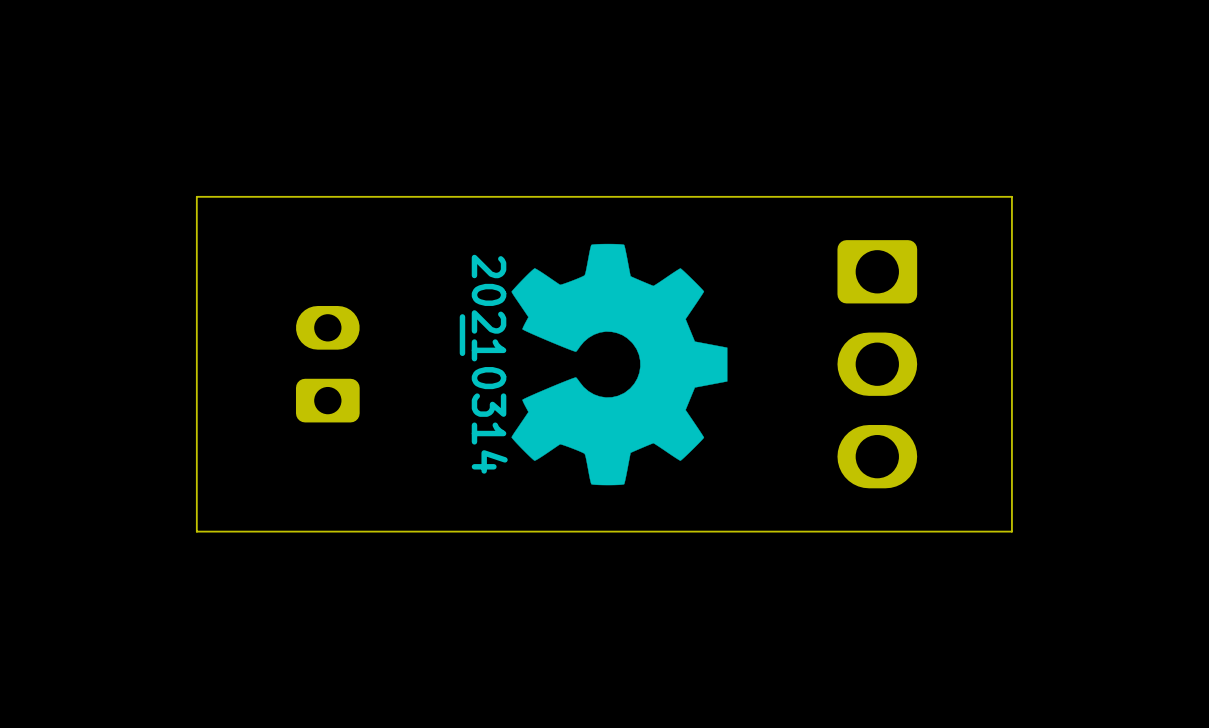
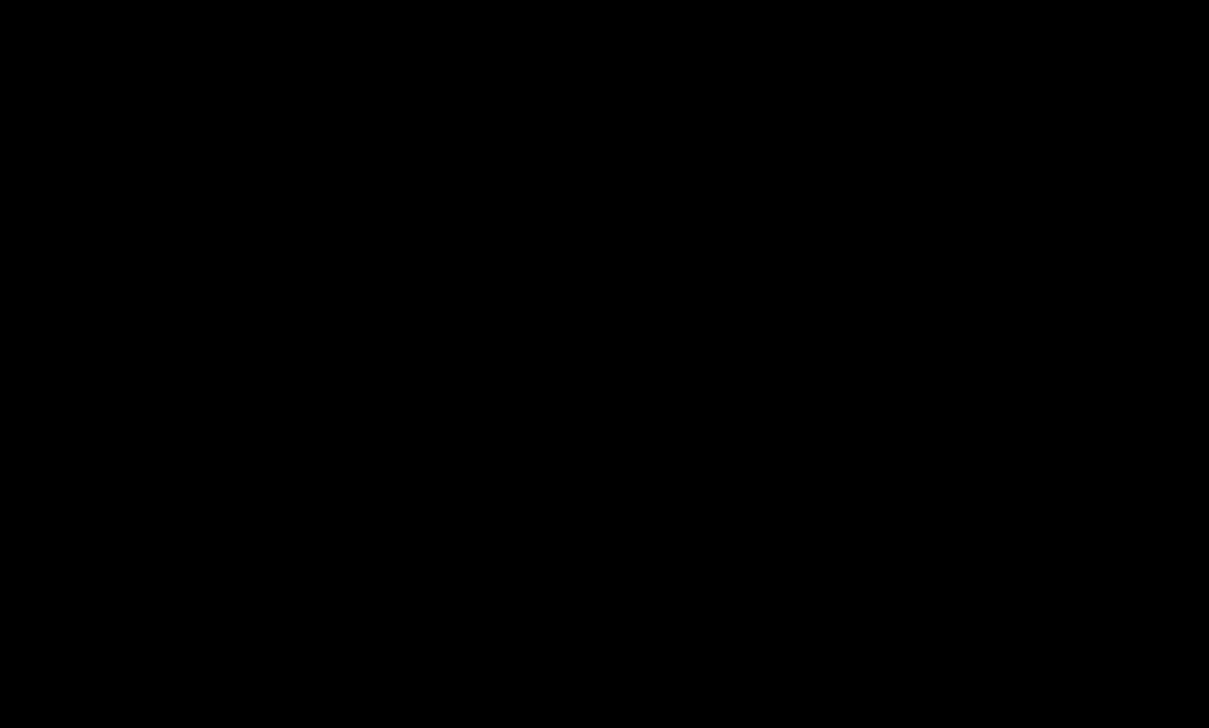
board edge: (1011, 196) (1011, 531) (196, 531) (196, 196) (1011, 196) -> none
drawing: [459, 243, 728, 486] -> none
part: (327, 364) -> none
part: (877, 364) -> none

